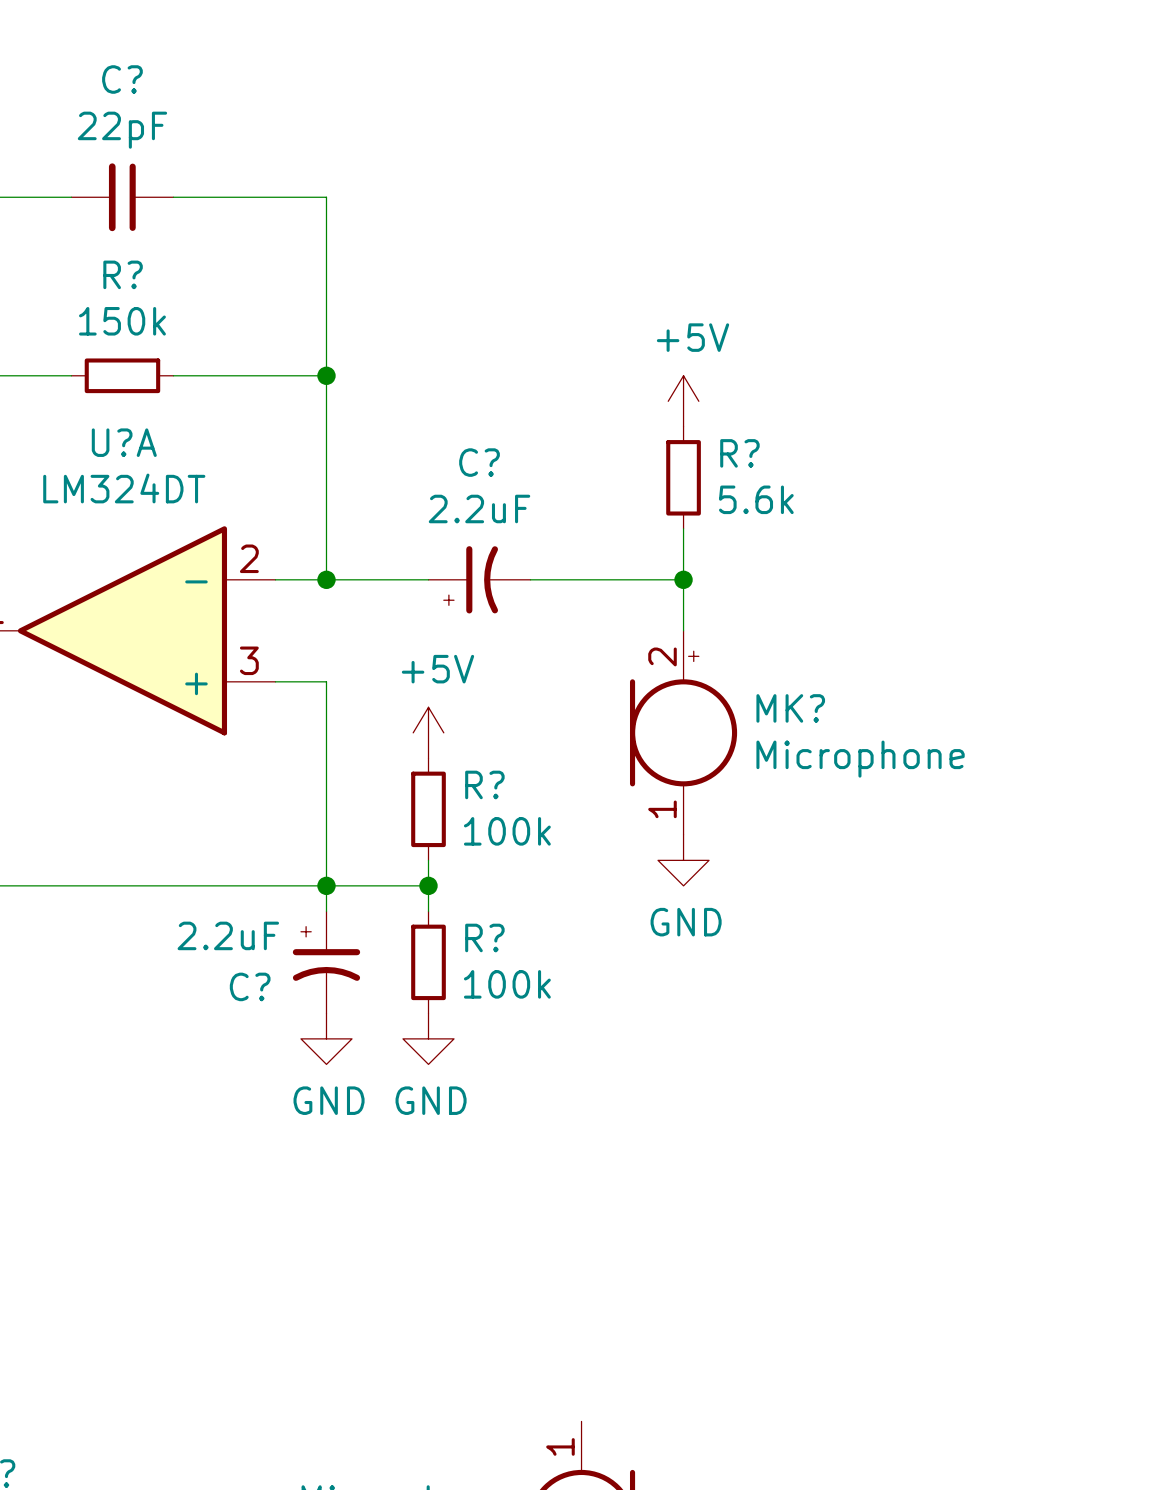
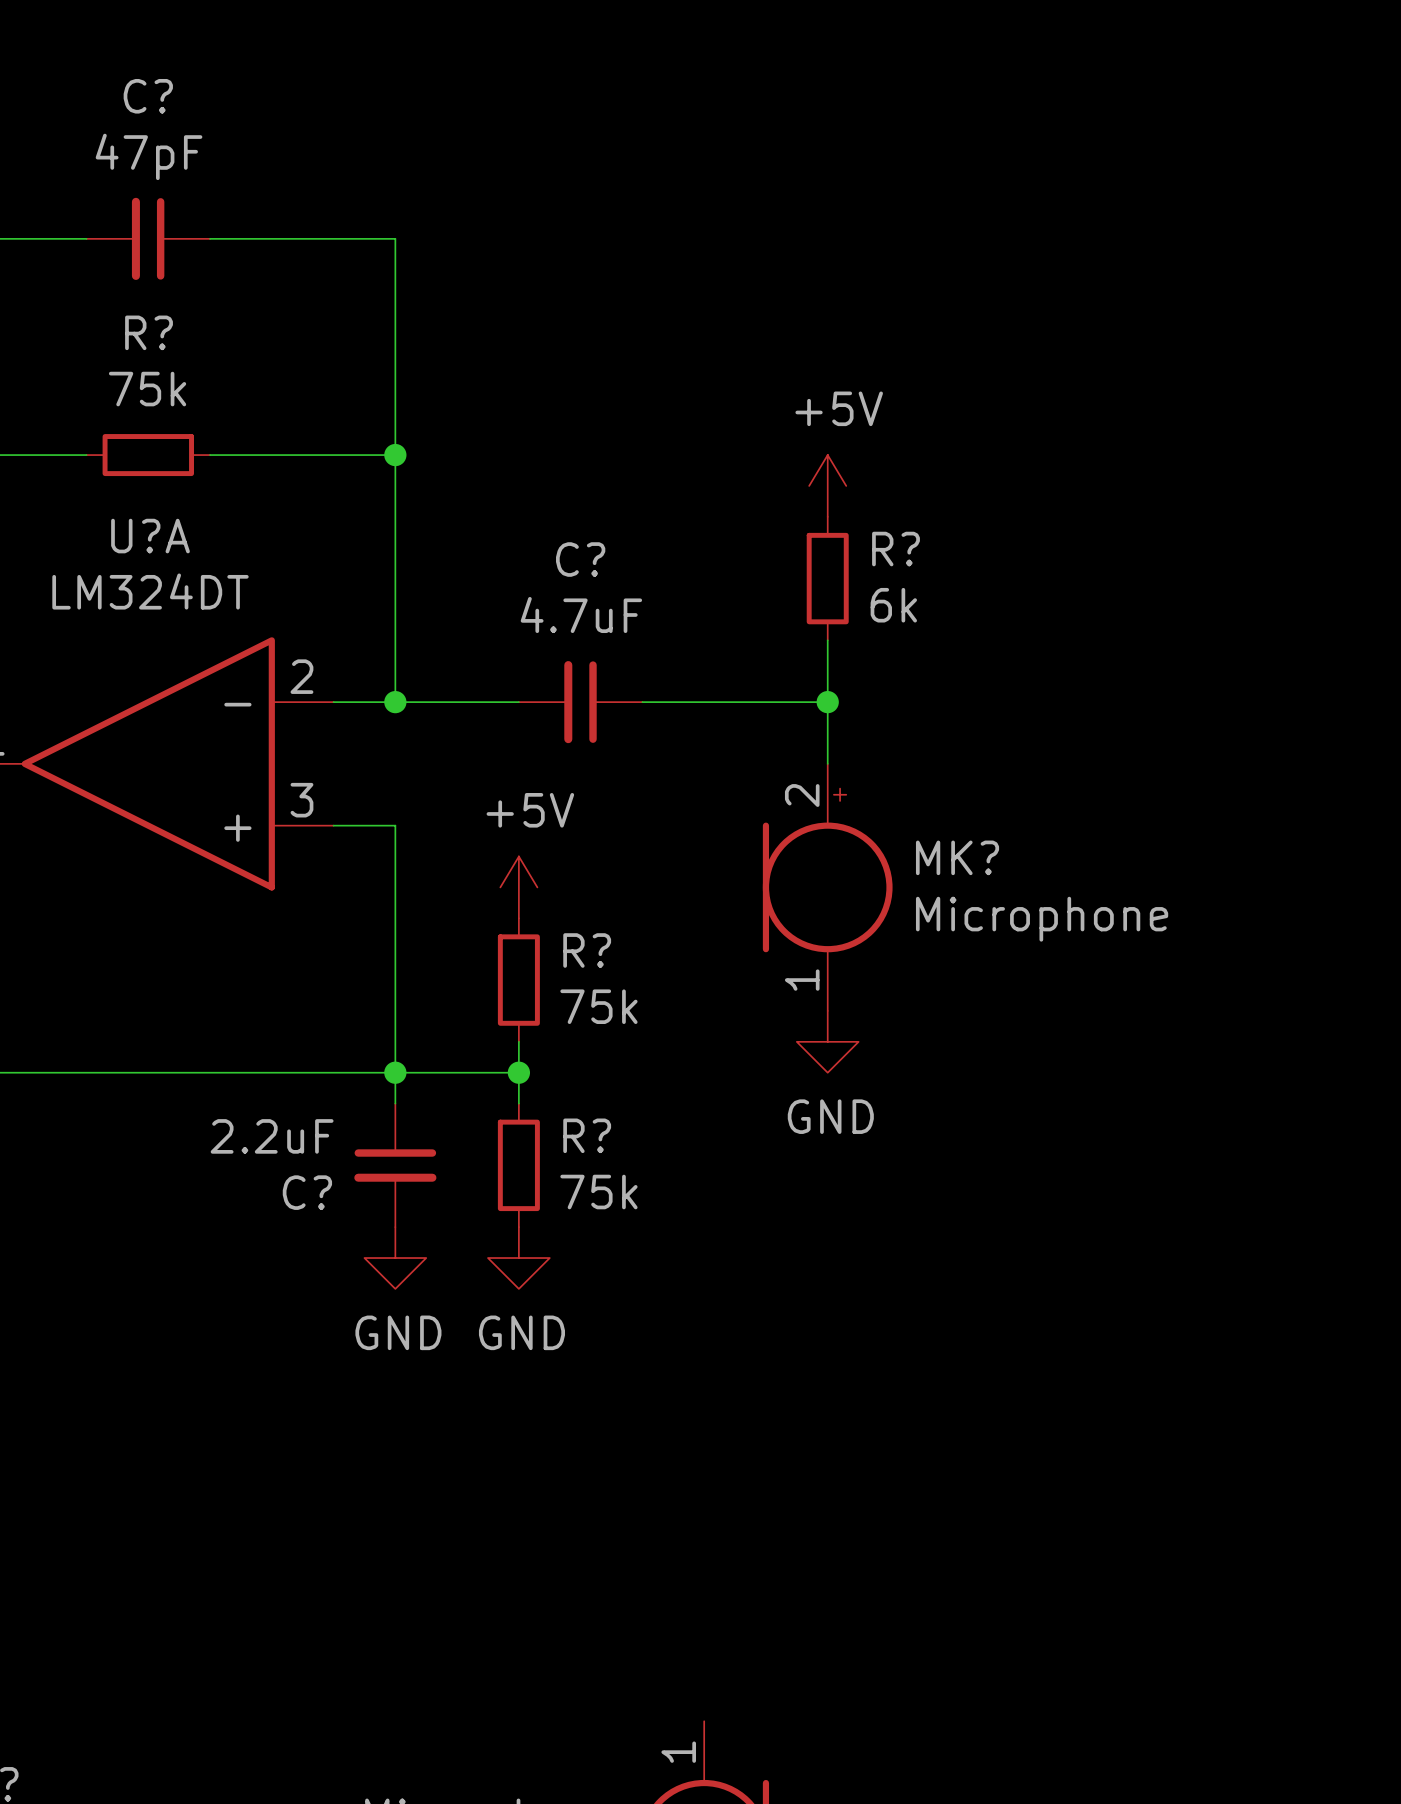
C? value: 22pF (122, 130) -> 47pF (149, 156)
R? value: 150k (122, 321) -> 75k (147, 389)
R? value: 5.6k (756, 499) -> 6k (893, 605)
C? value: 2.2uF (479, 508) -> 4.7uF (581, 614)
C? symbol: [428, 546, 531, 614] -> [518, 661, 643, 744]
R? value: 100k (507, 831) -> 75k (598, 1006)
C? symbol: [292, 911, 361, 1014] -> [354, 1103, 437, 1228]
R? value: 100k (507, 984) -> 75k (598, 1192)

